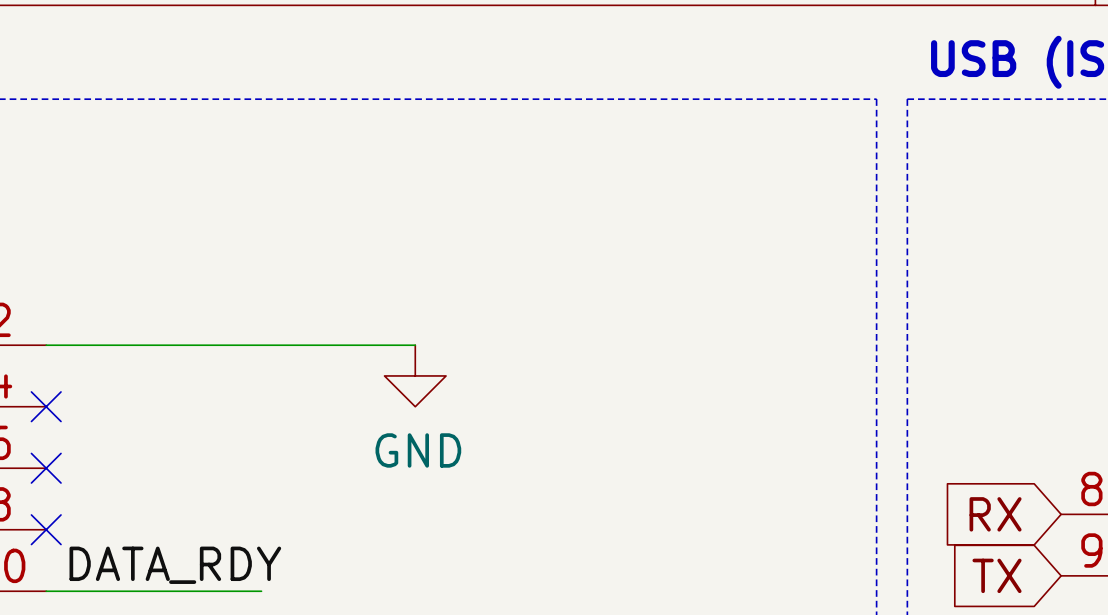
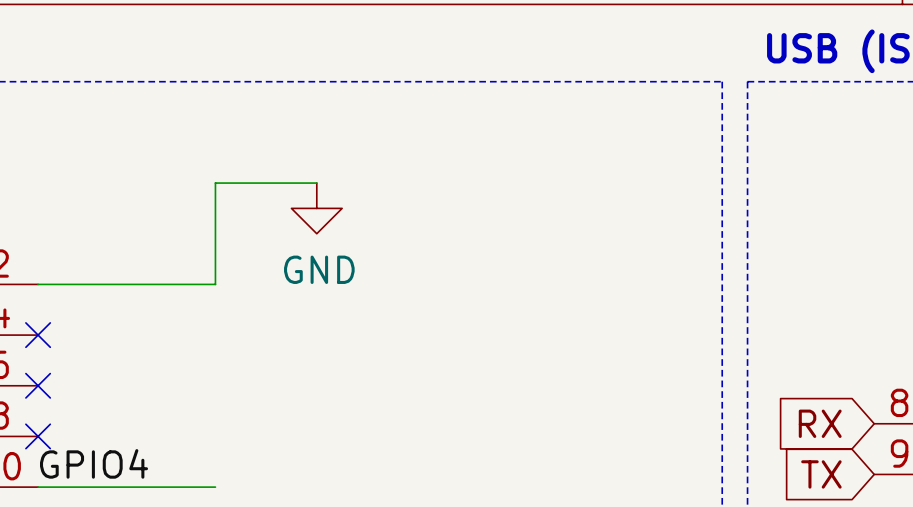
wire: (261, 345) (415, 345) -> (215, 284) (215, 183) (316, 183)
power symbol position: GND (415, 375) -> GND (316, 208)
label: none -> GPIO4 (94, 463)
label: DATA_RDY (175, 565) -> none

